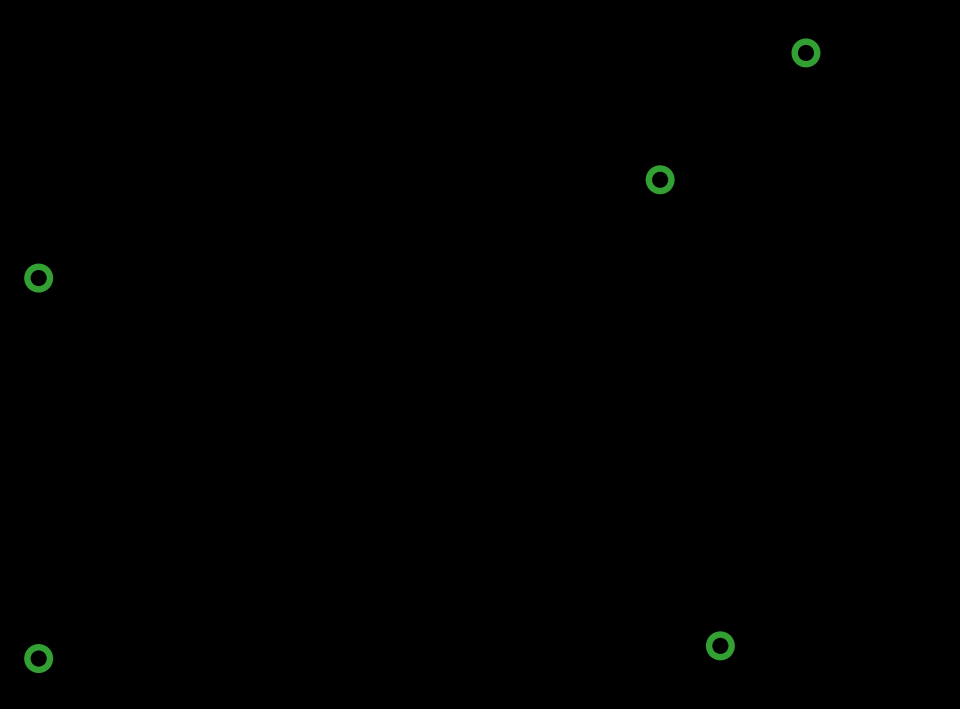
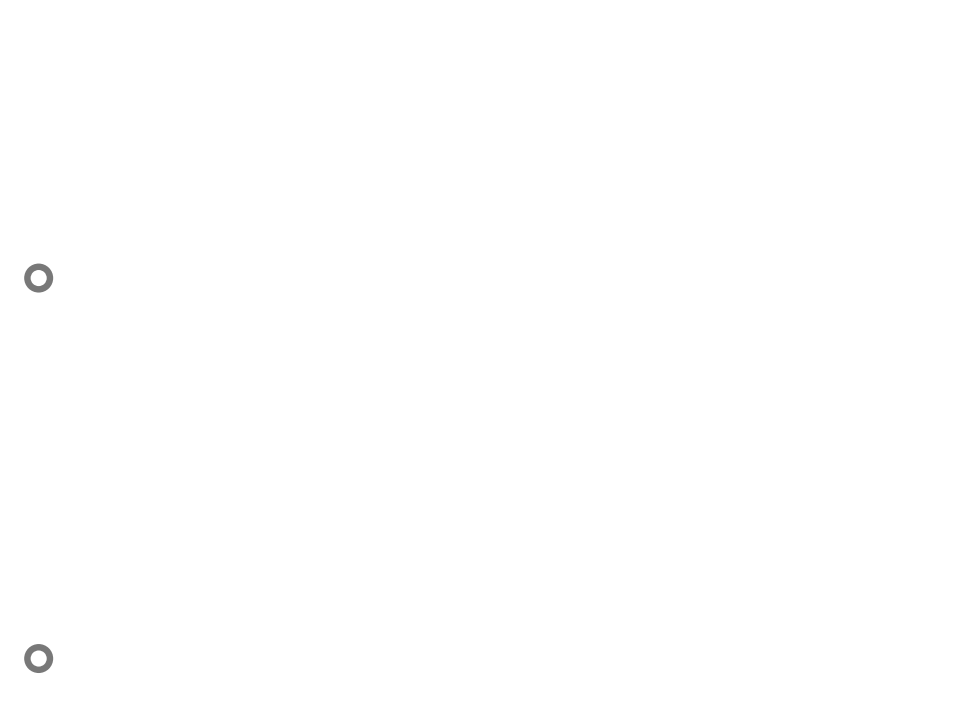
via: (805, 52) -> none
via: (660, 179) -> none
via: (720, 645) -> none

